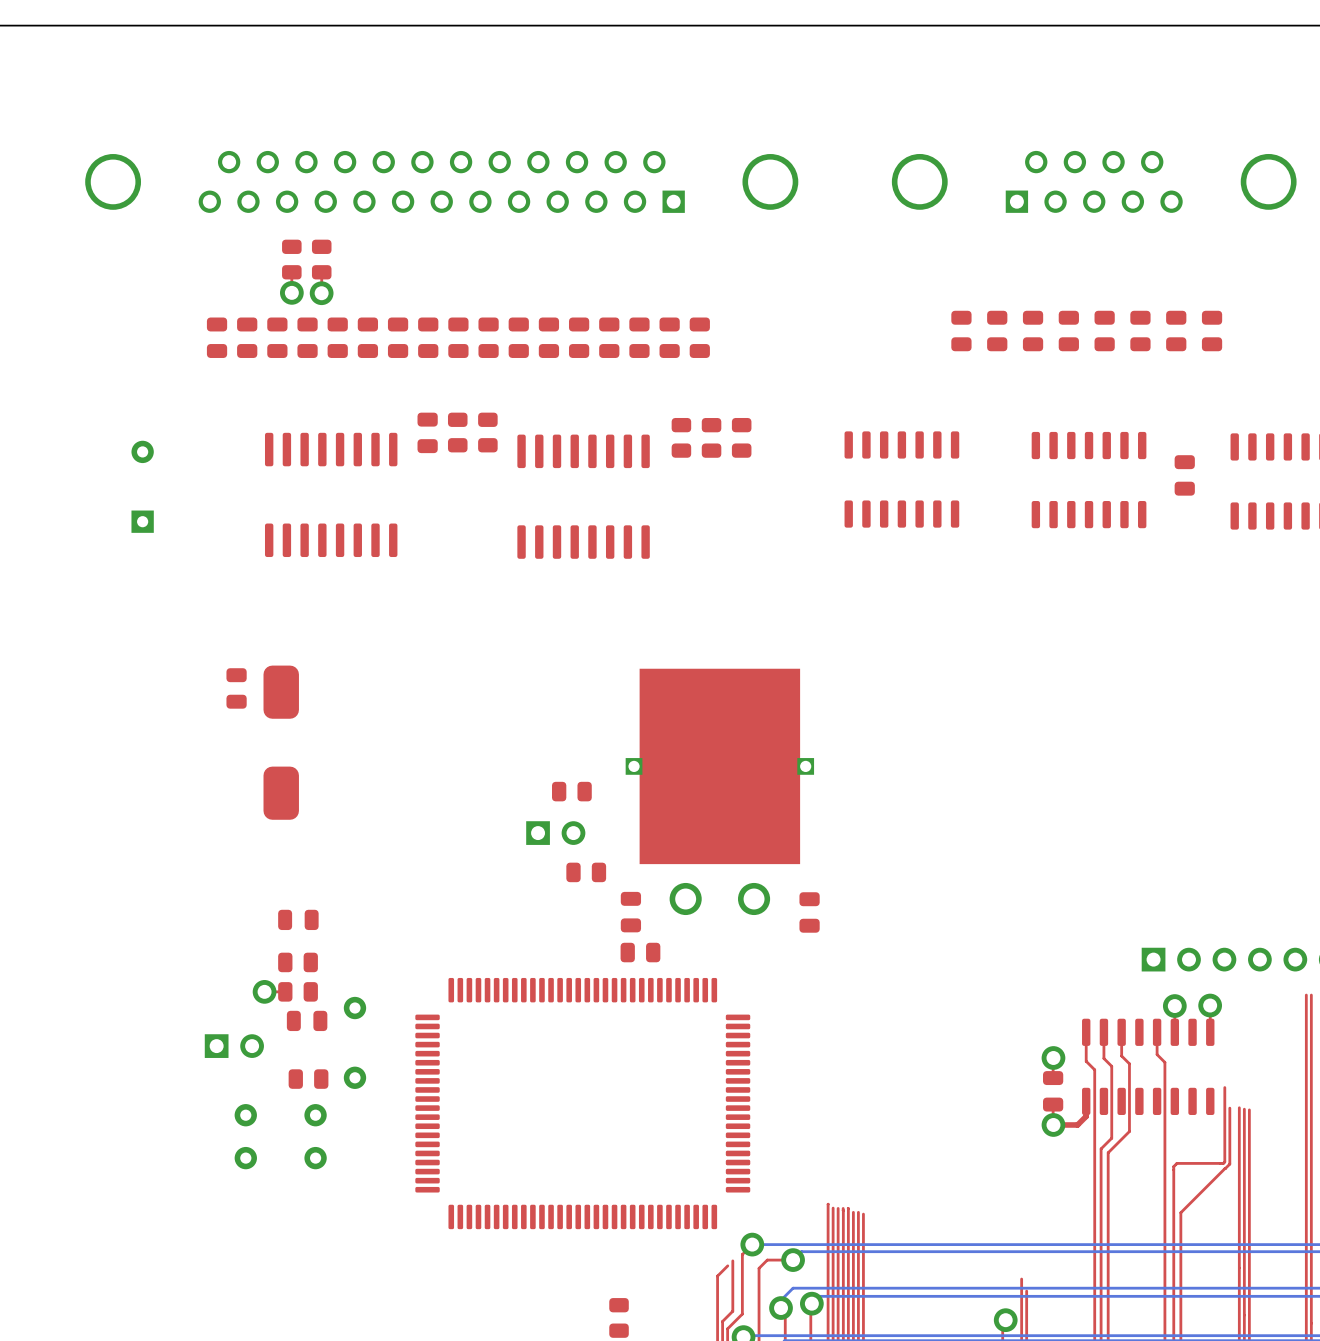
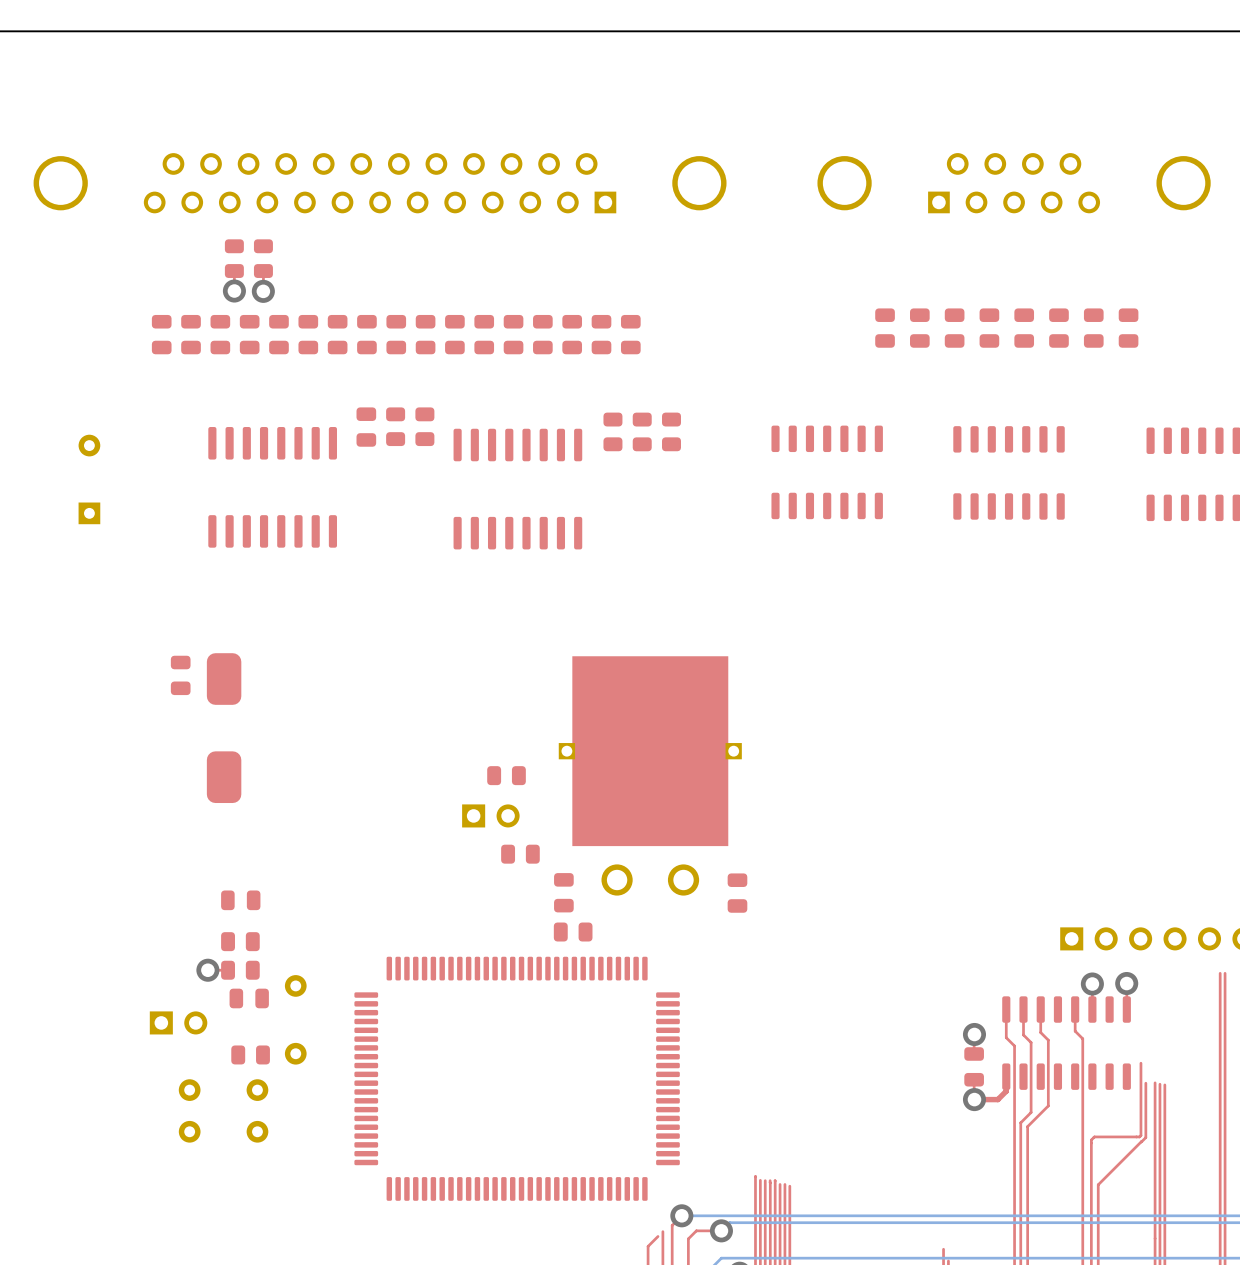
part: (1184, 475) -> none

